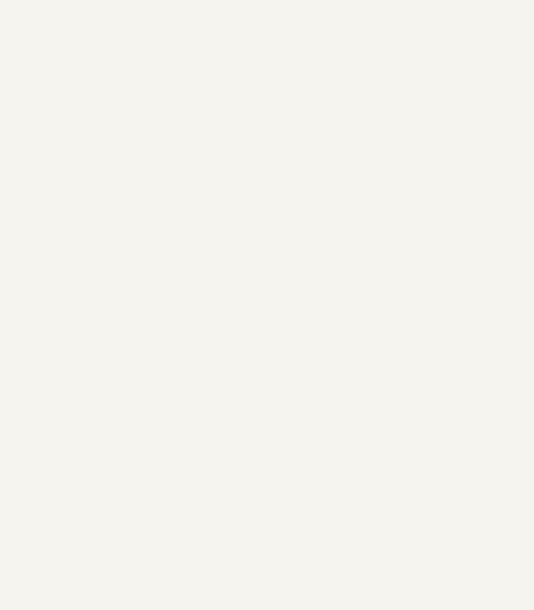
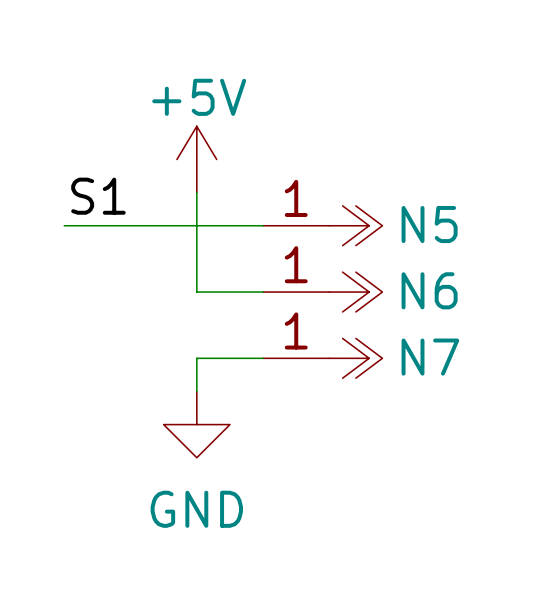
power symbol: none -> +5V (196, 159)
wire: none -> (196, 192) (196, 292) (263, 292)
label: none -> S1 (98, 196)
wire: none -> (64, 225) (263, 225)
N5: none -> (322, 225)
N6: none -> (322, 292)
wire: none -> (263, 358) (196, 358) (196, 391)
N7: none -> (322, 358)
power symbol: none -> GND (196, 424)

